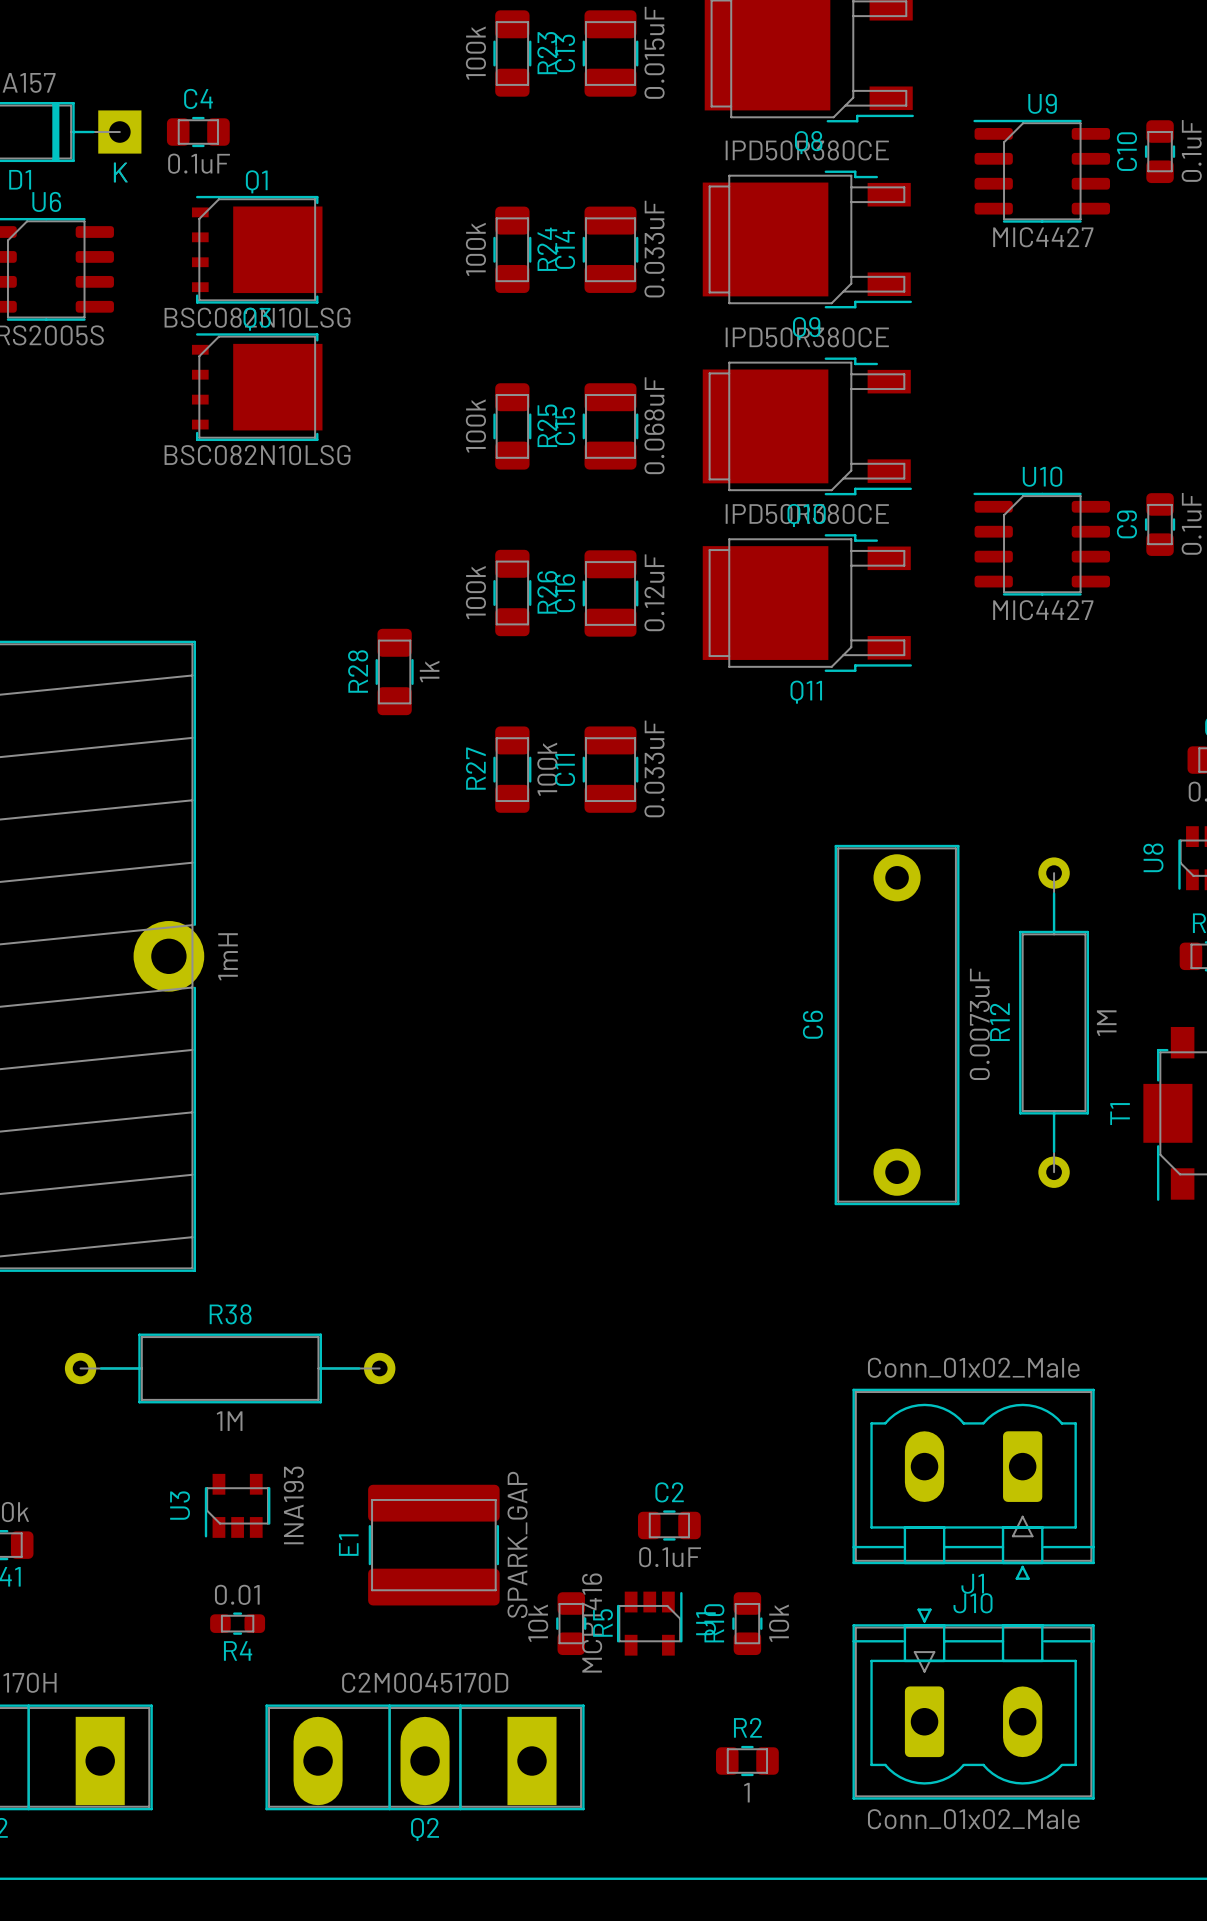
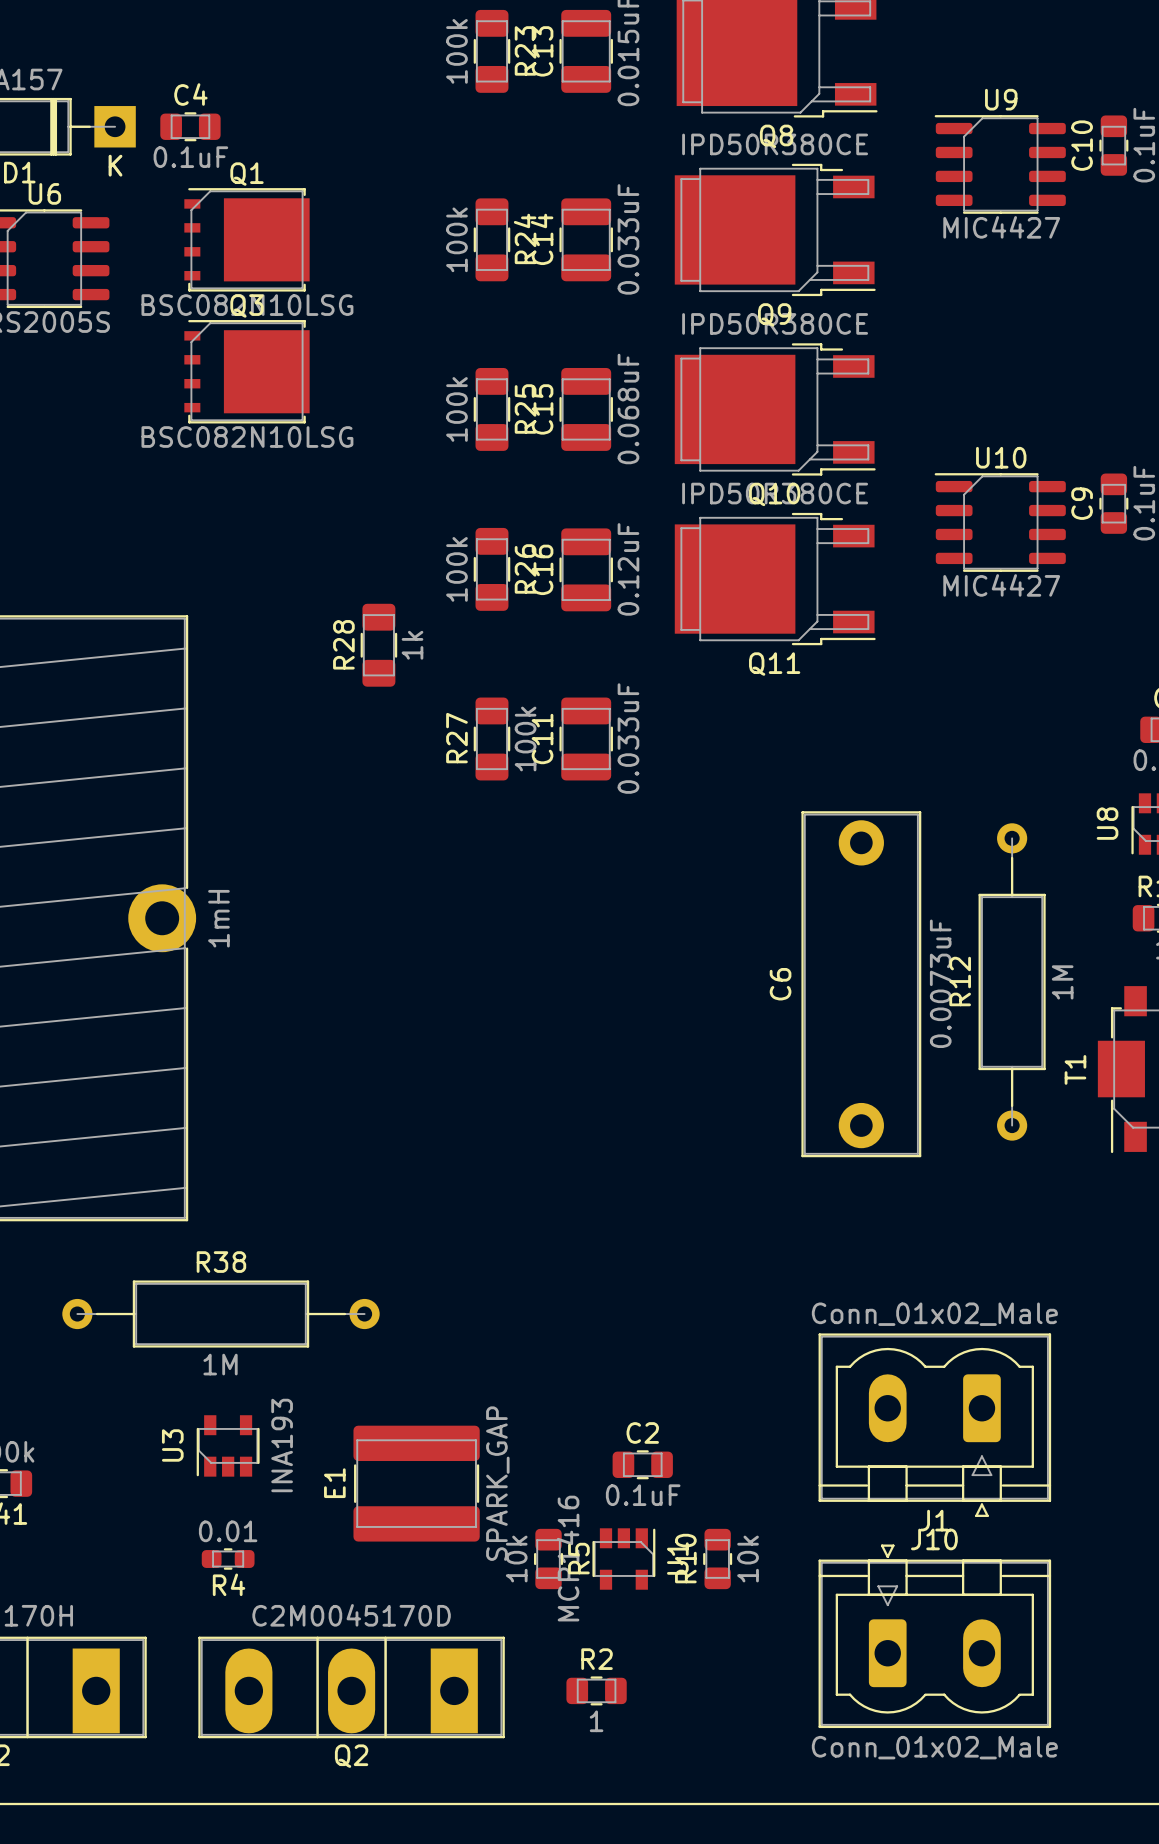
Q2 position: (425, 1757) -> (351, 1687)
R2 position: (747, 1761) -> (596, 1690)

